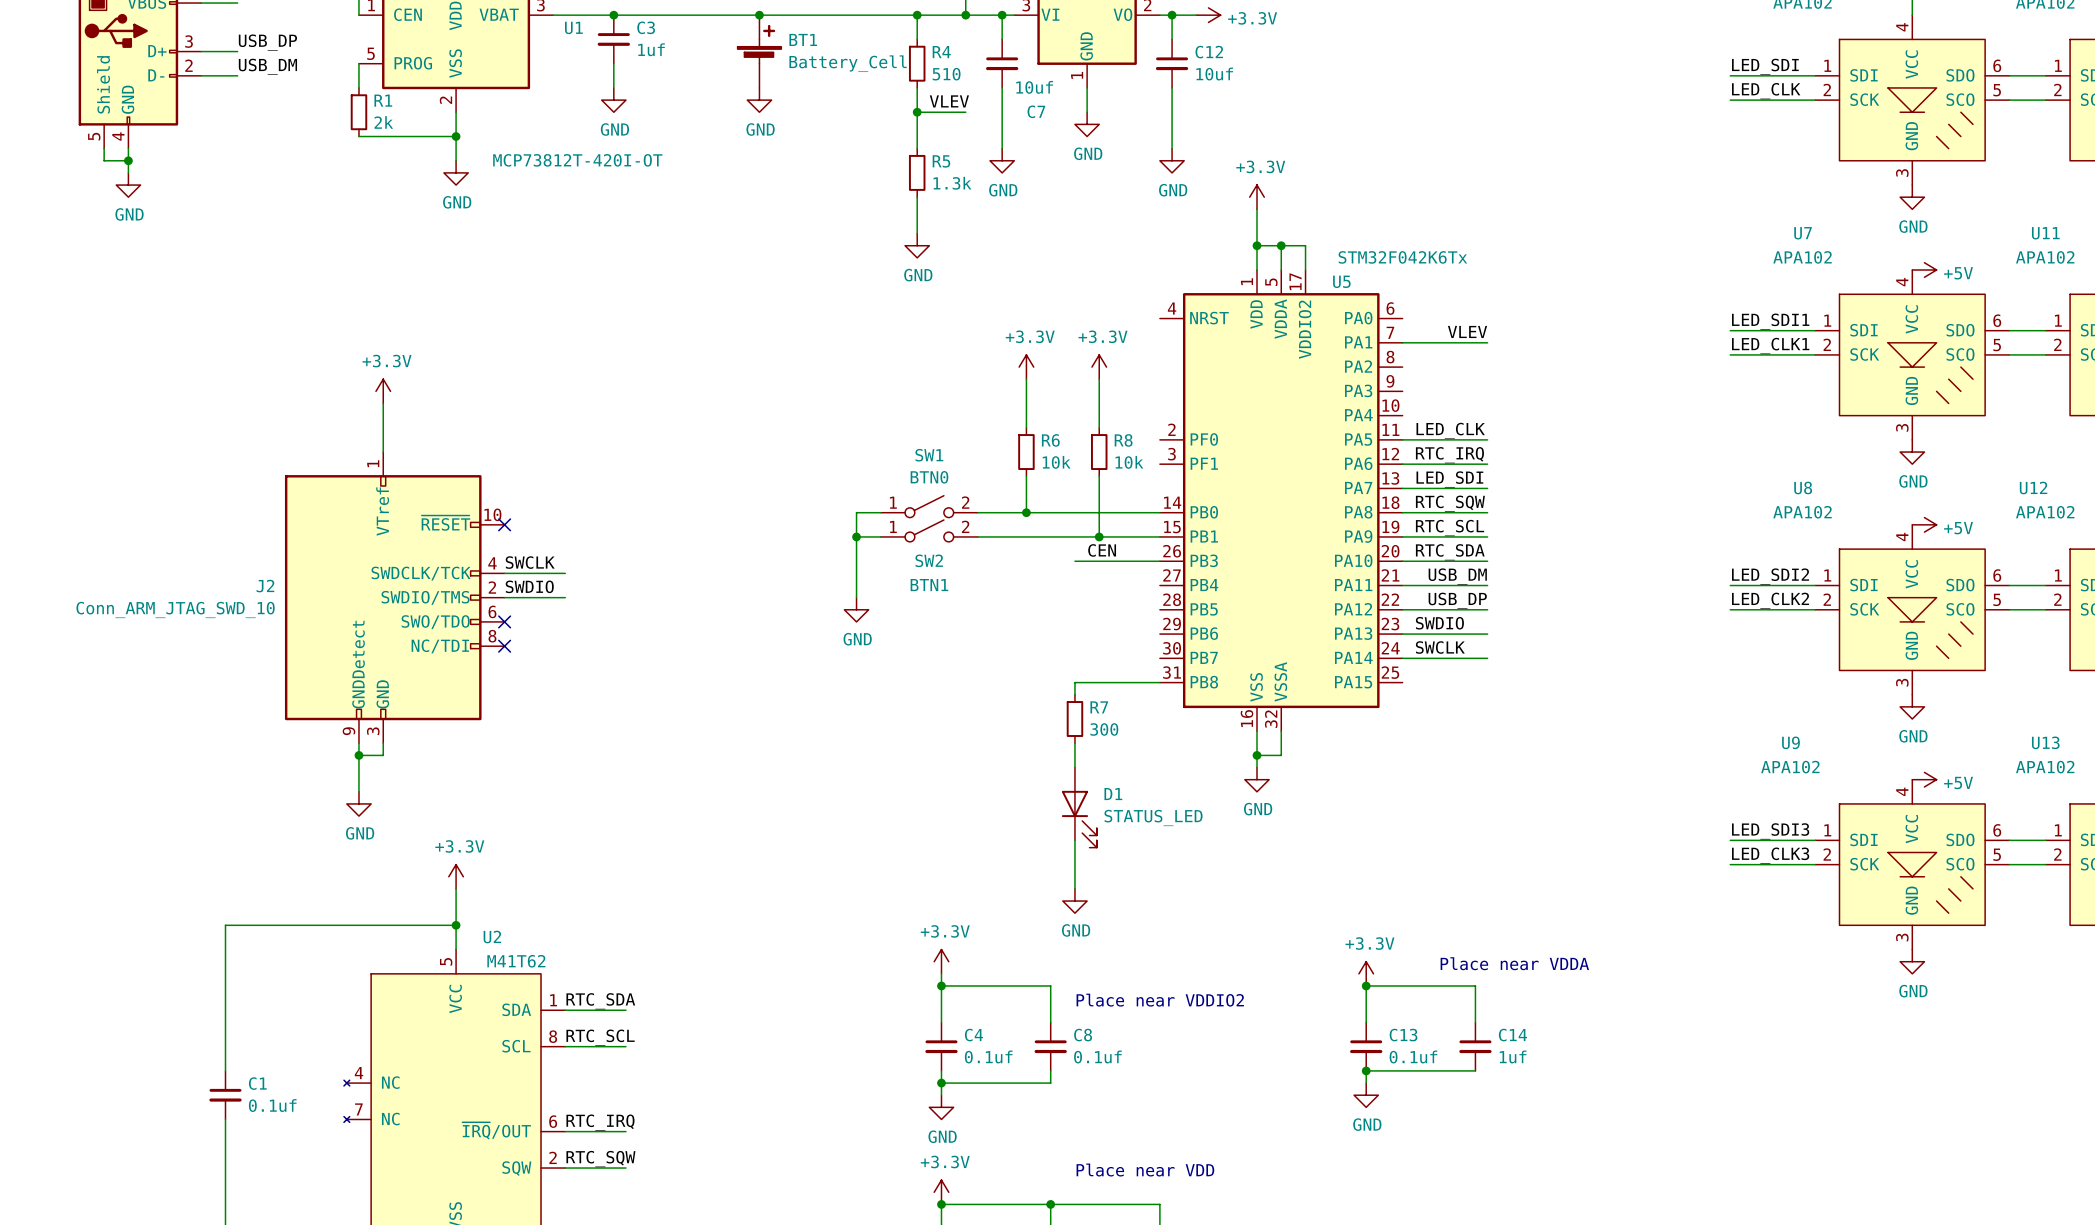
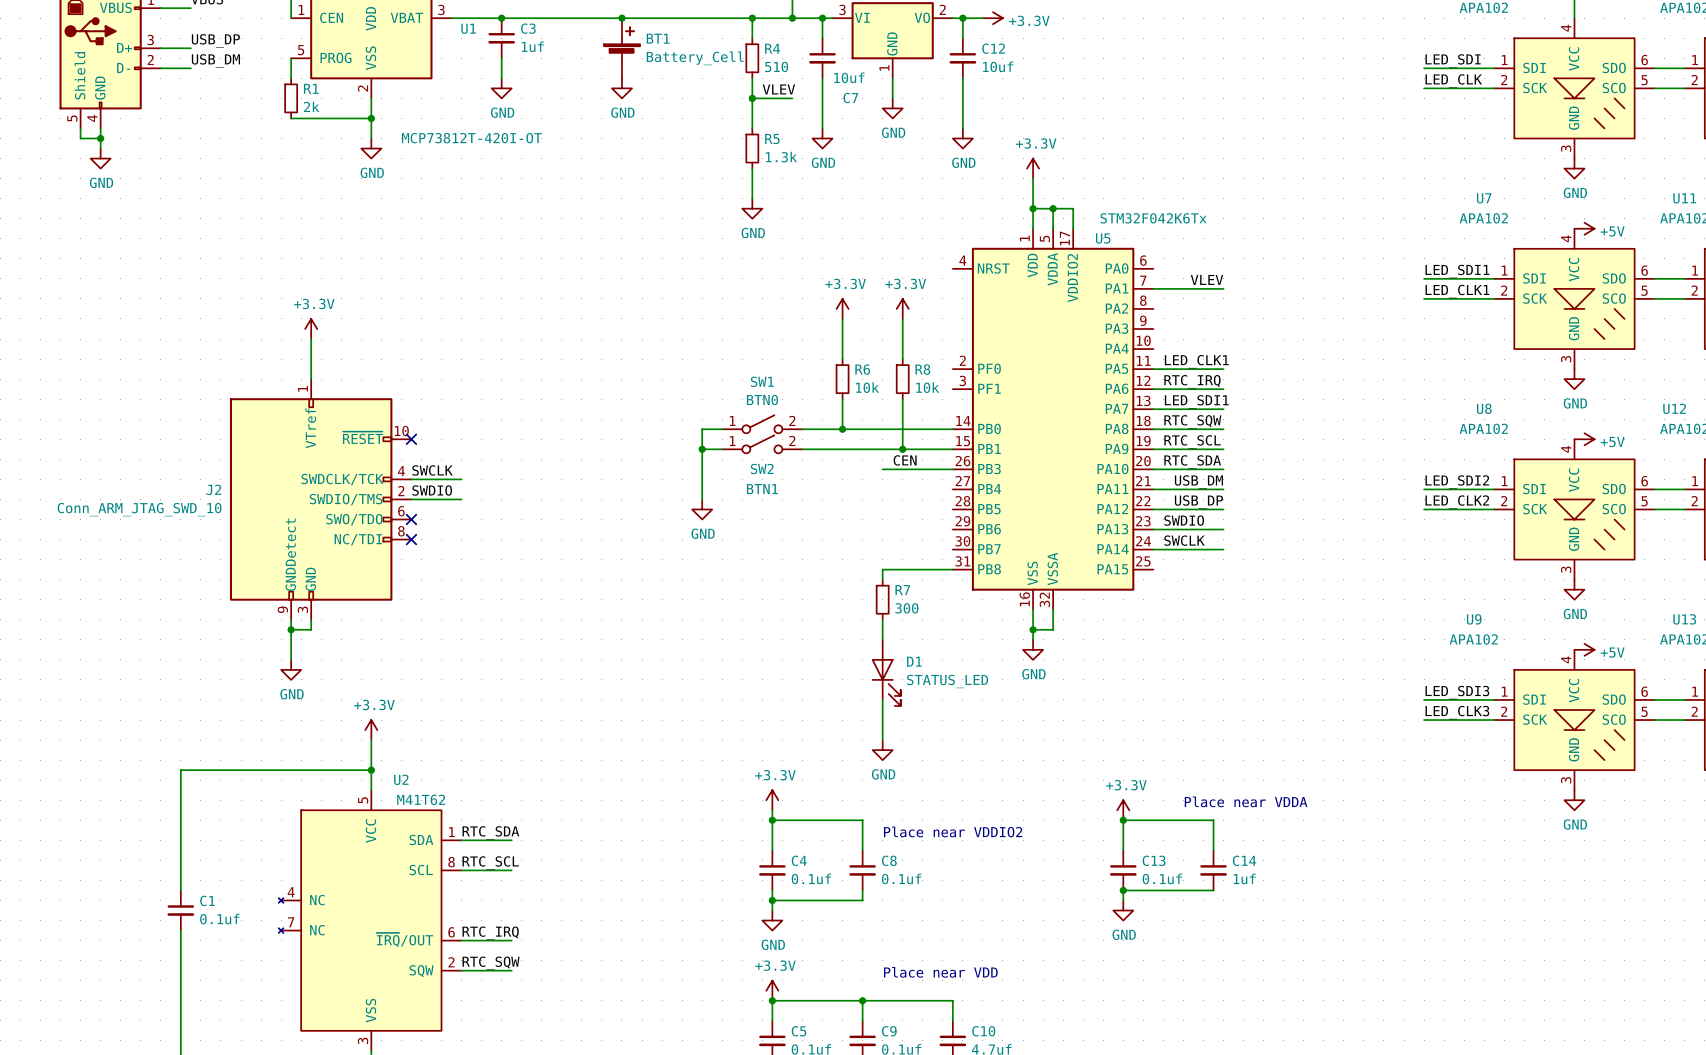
label: LED_CLK (1450, 430) -> LED_CLK1 (1196, 361)
label: LED_SDI (1449, 479) -> LED_SDI1 (1196, 401)

